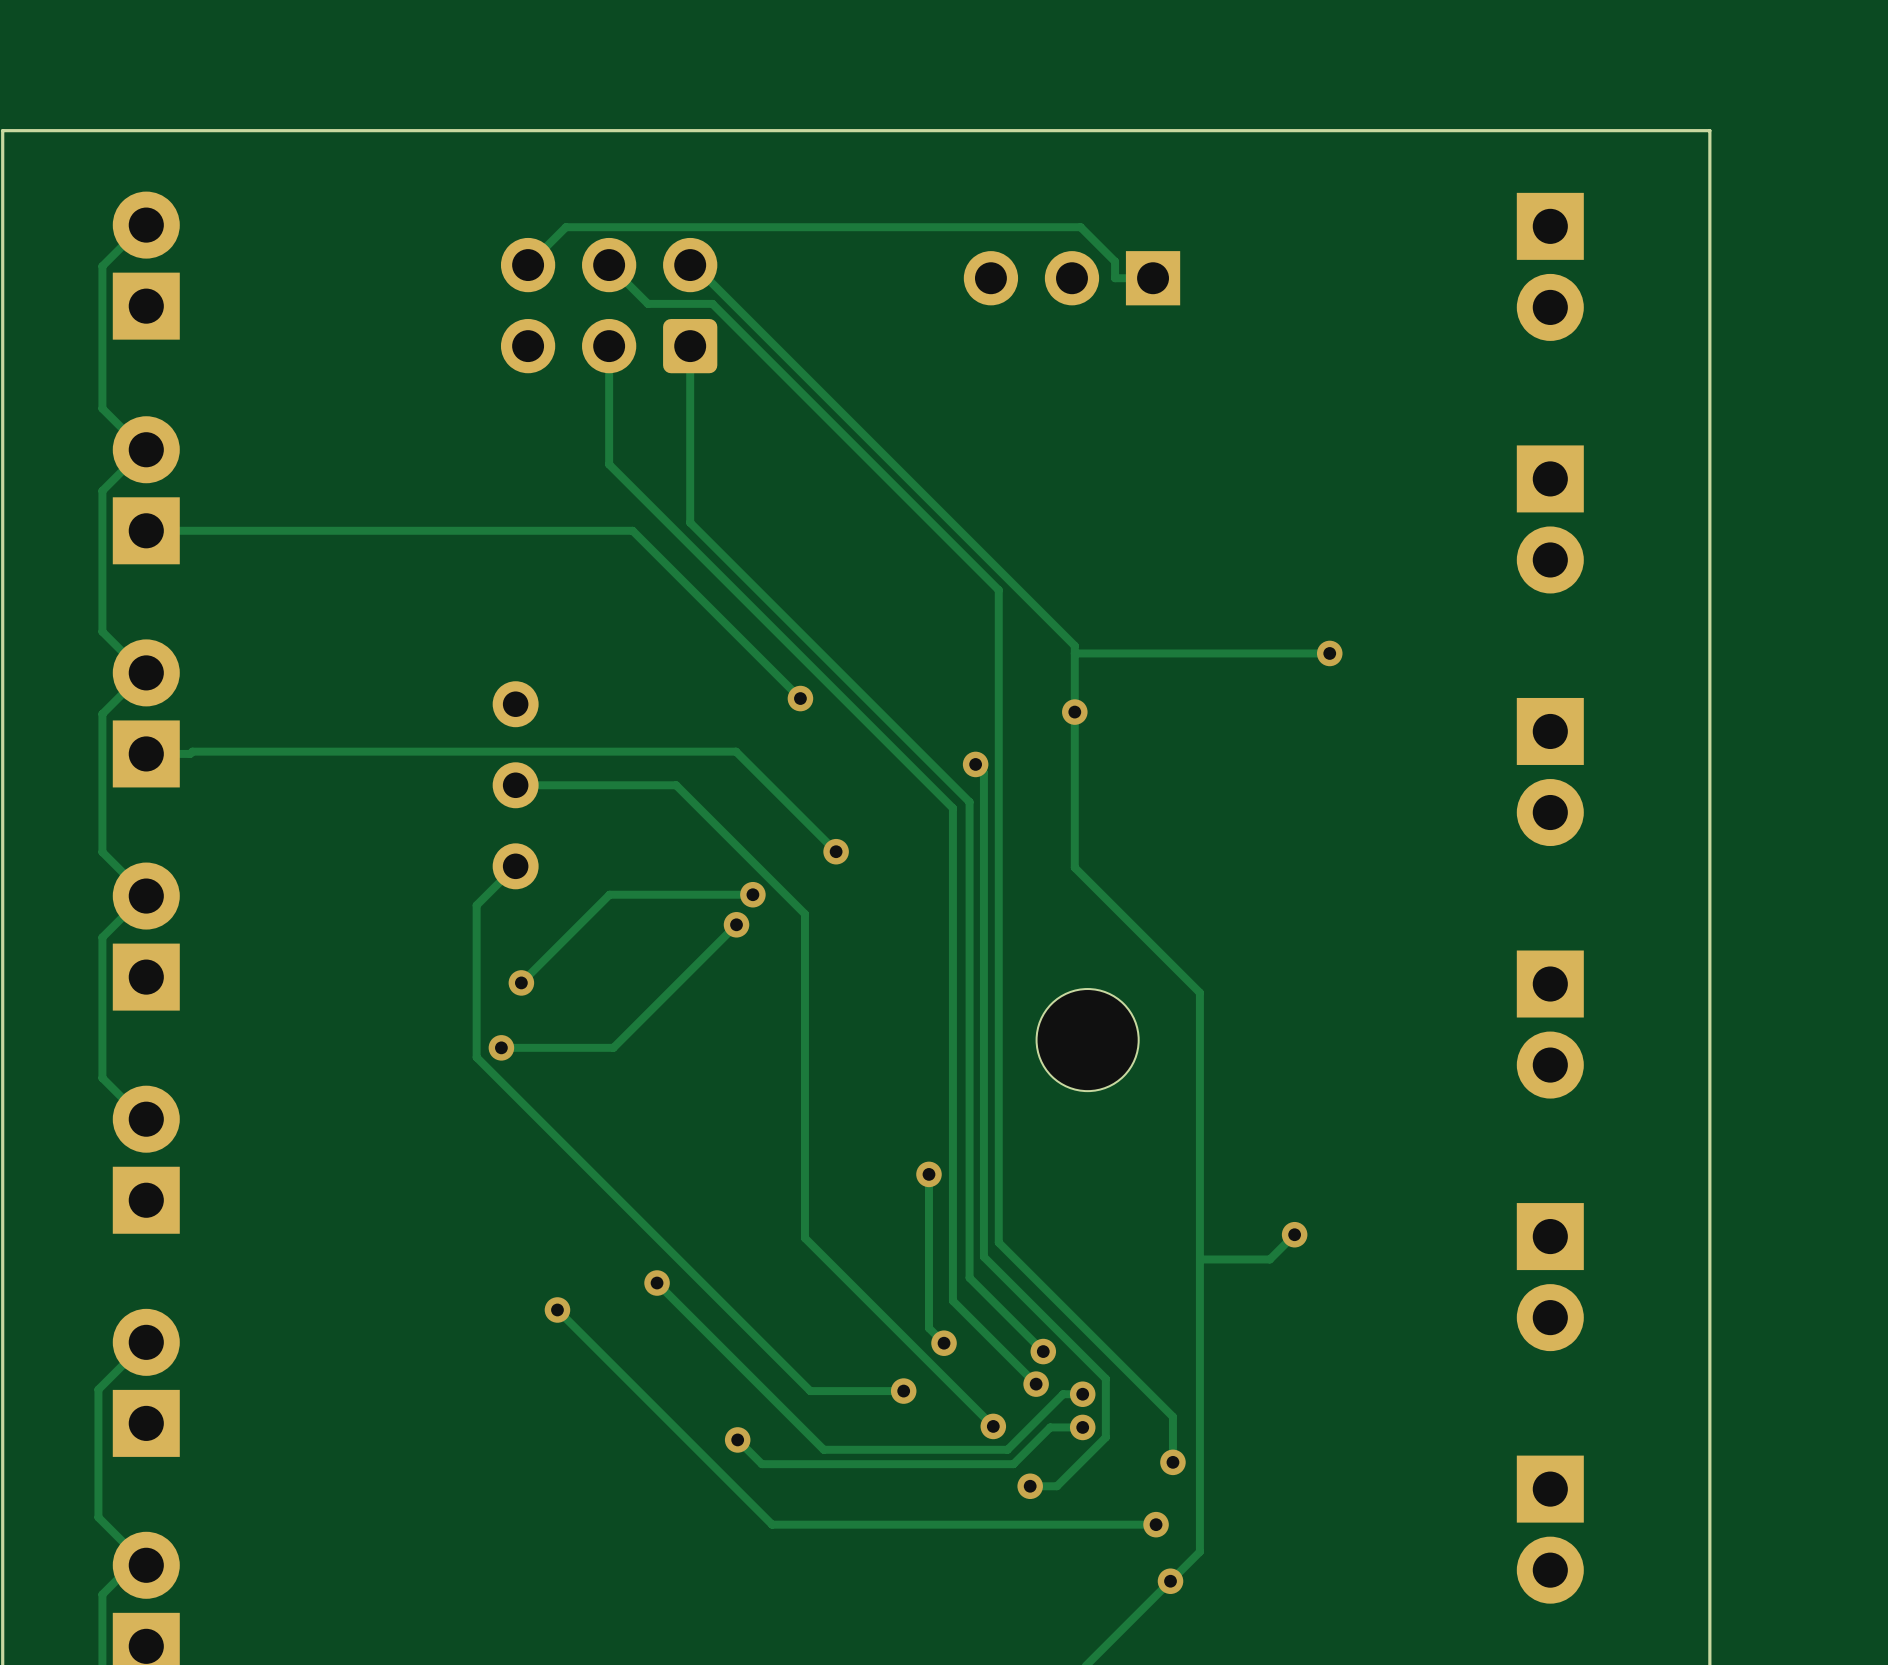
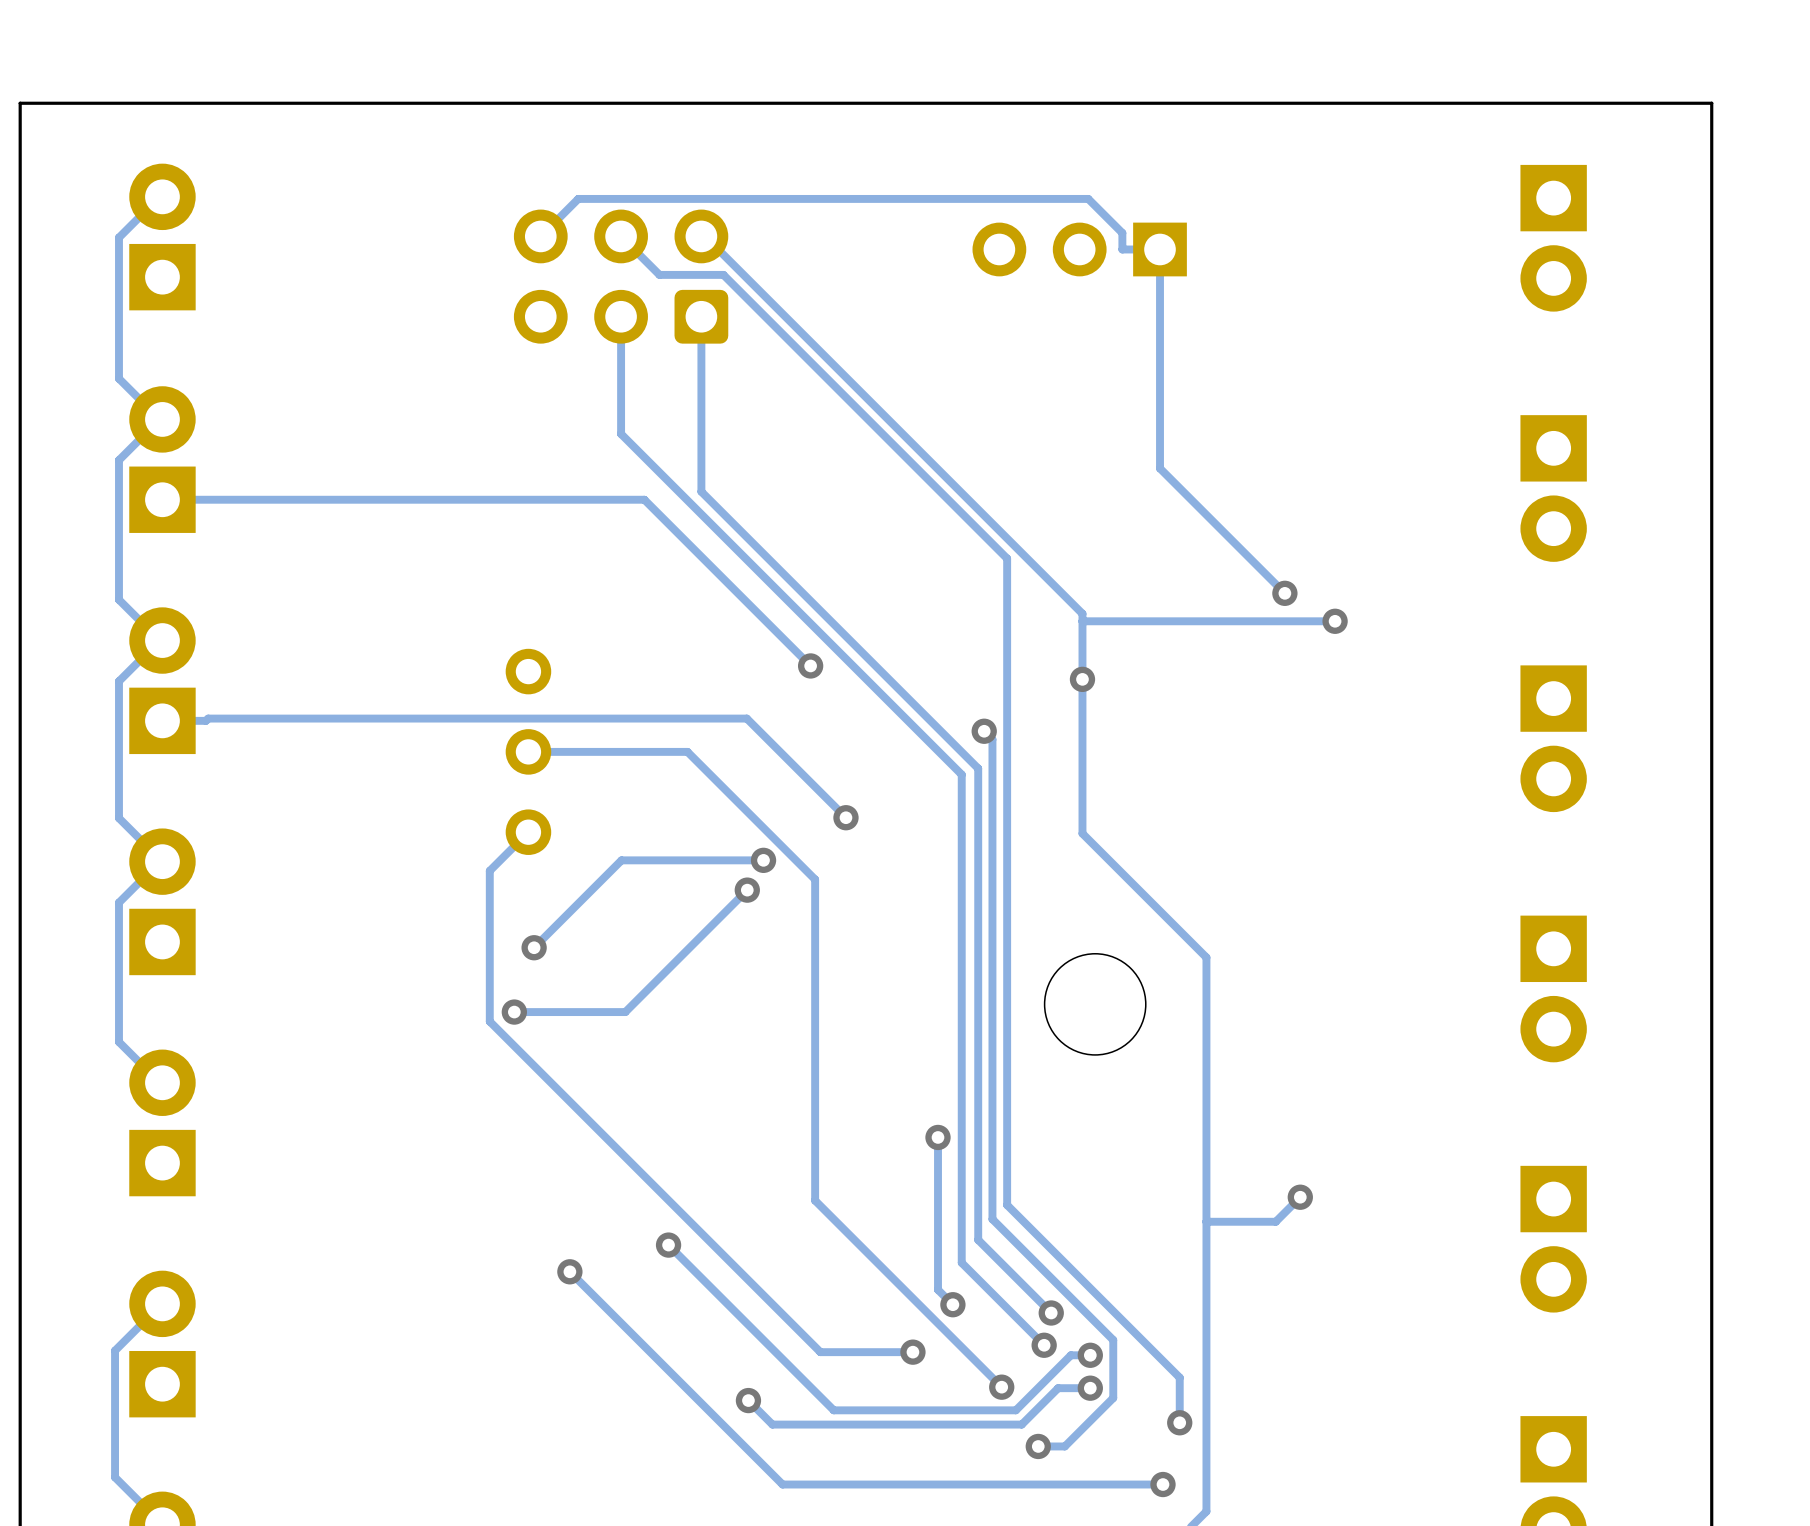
track: none -> (1160, 249) (1160, 468) (1284, 593)
via: none -> (1284, 593)

